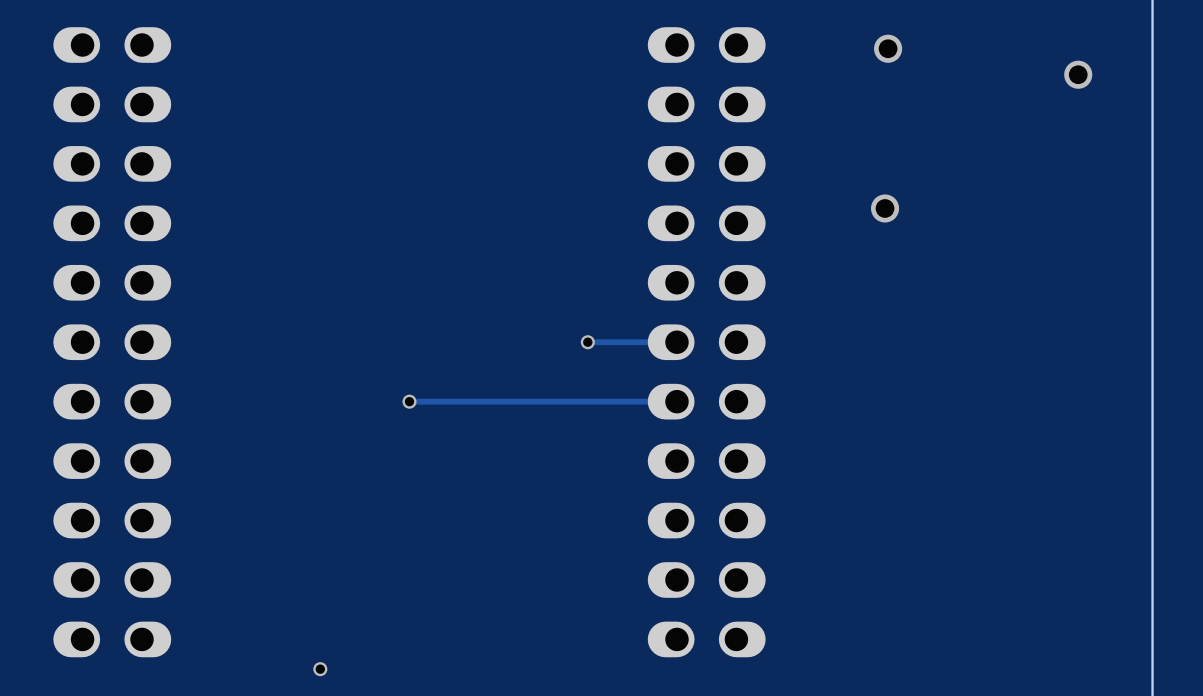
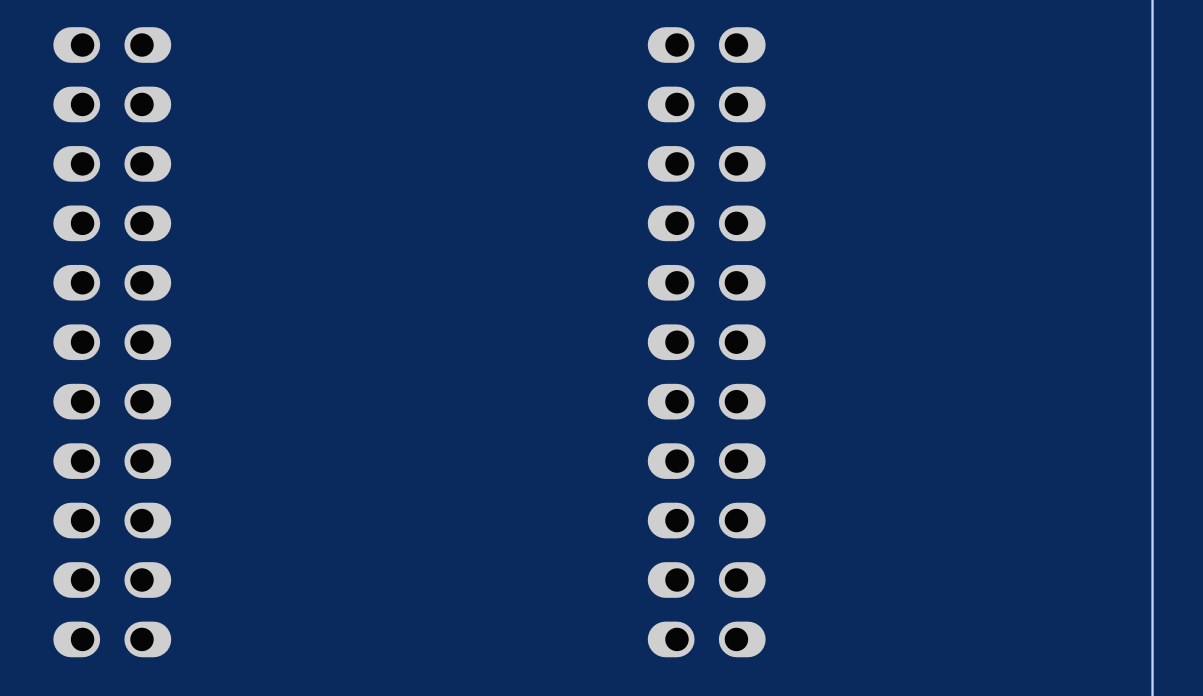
via: (888, 48) -> none
via: (1078, 74) -> none
via: (885, 208) -> none
via: (587, 342) -> none
track: (676, 342) (587, 342) -> none
via: (409, 401) -> none
track: (676, 401) (409, 401) -> none
via: (320, 669) -> none

